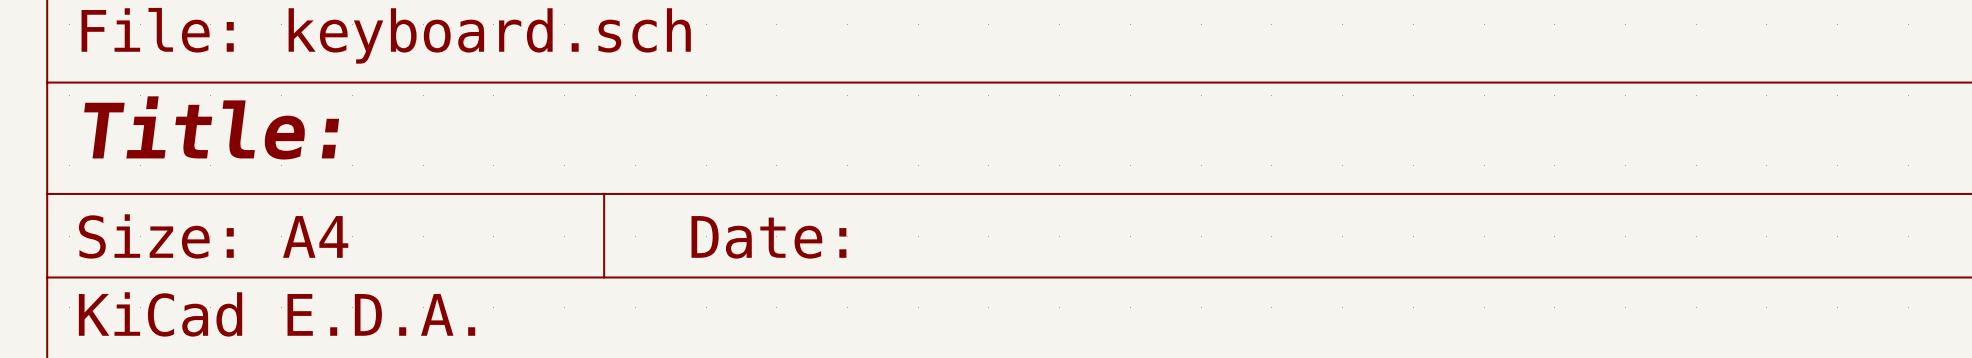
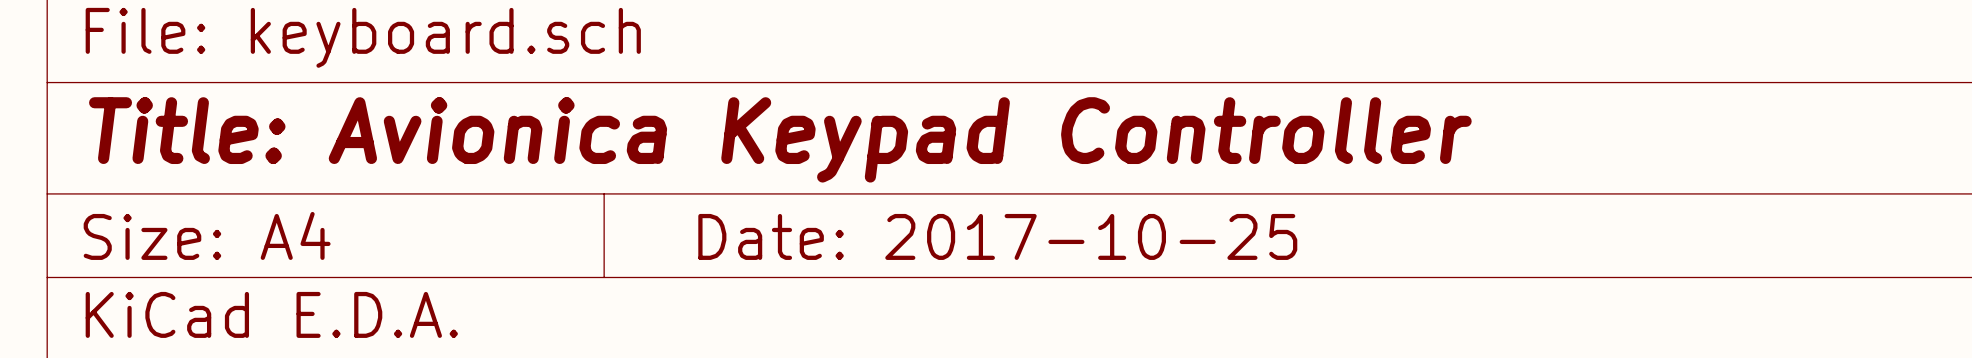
title block: Title: (211, 127) -> Title: Avionica Keypad Controller (780, 139)
title block: Date: (768, 237) -> Date: 2017-10-25 (997, 236)

